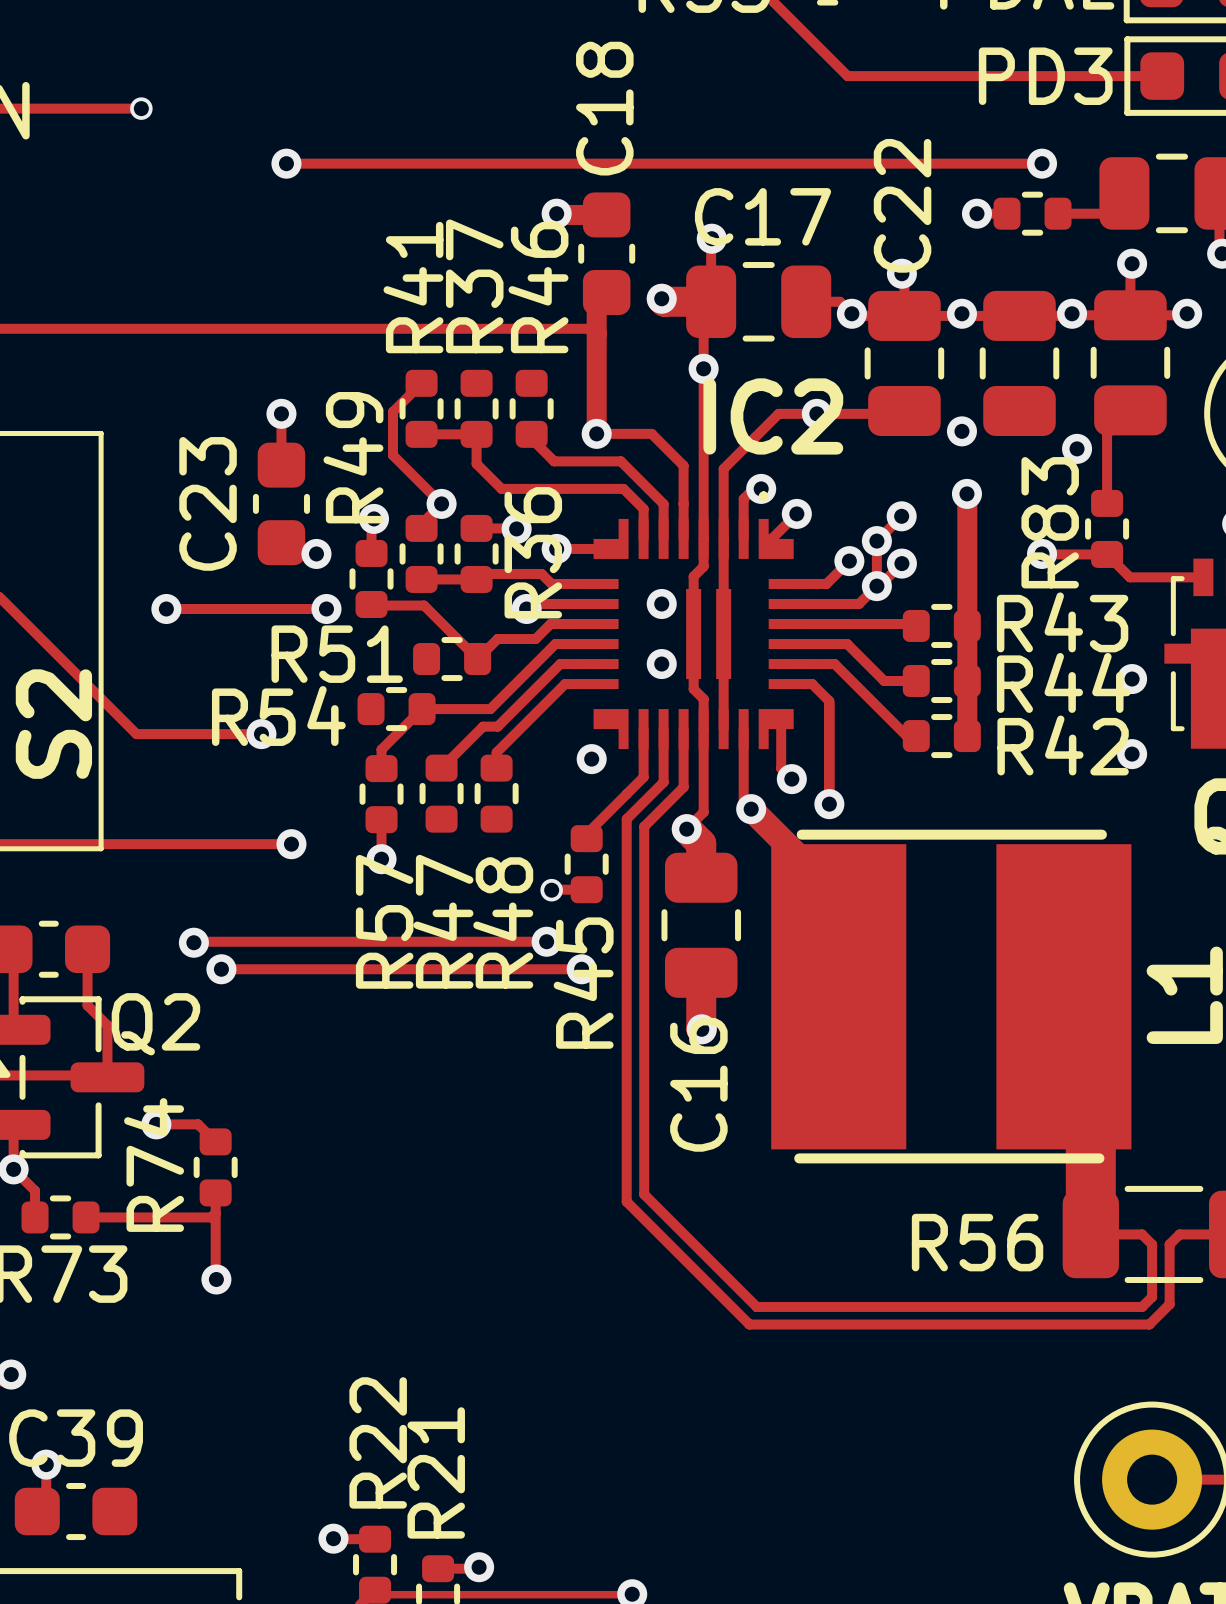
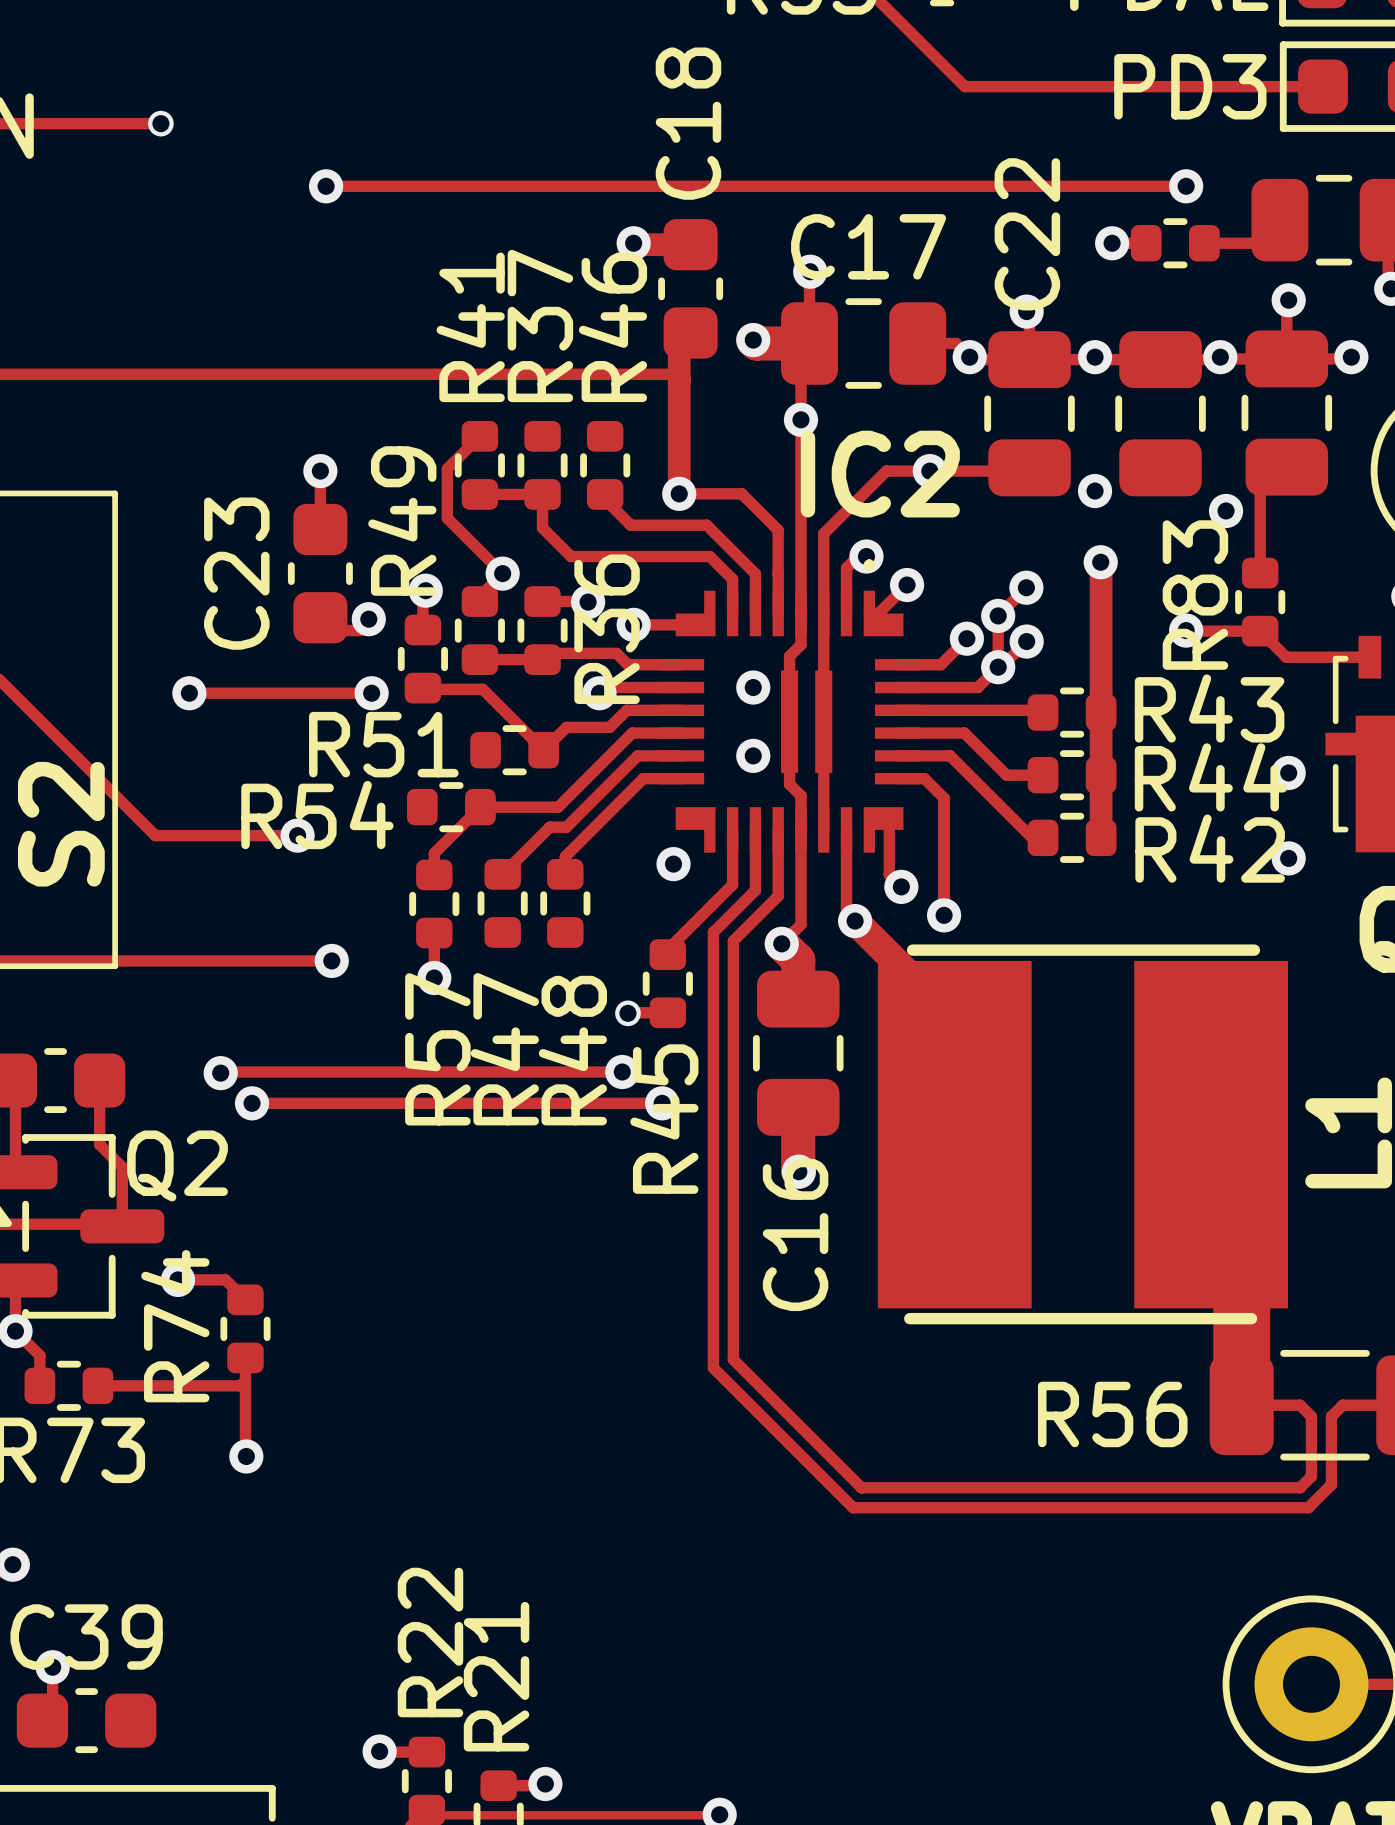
via position: (316, 553) -> (368, 619)

